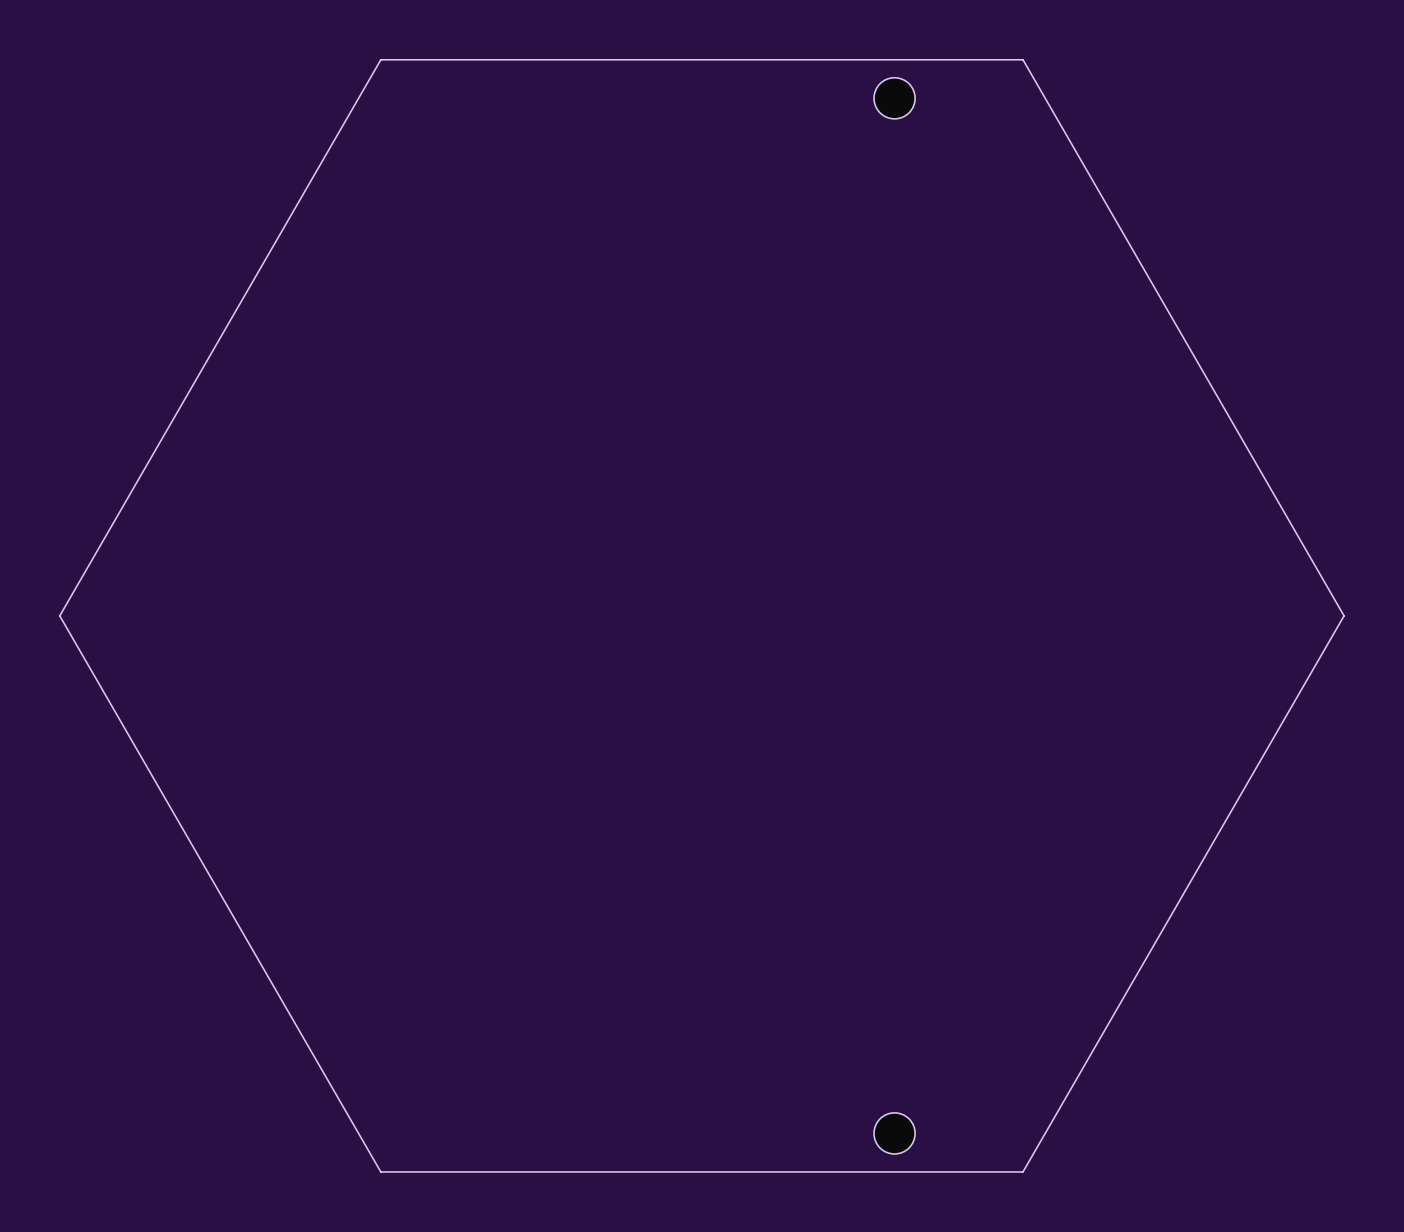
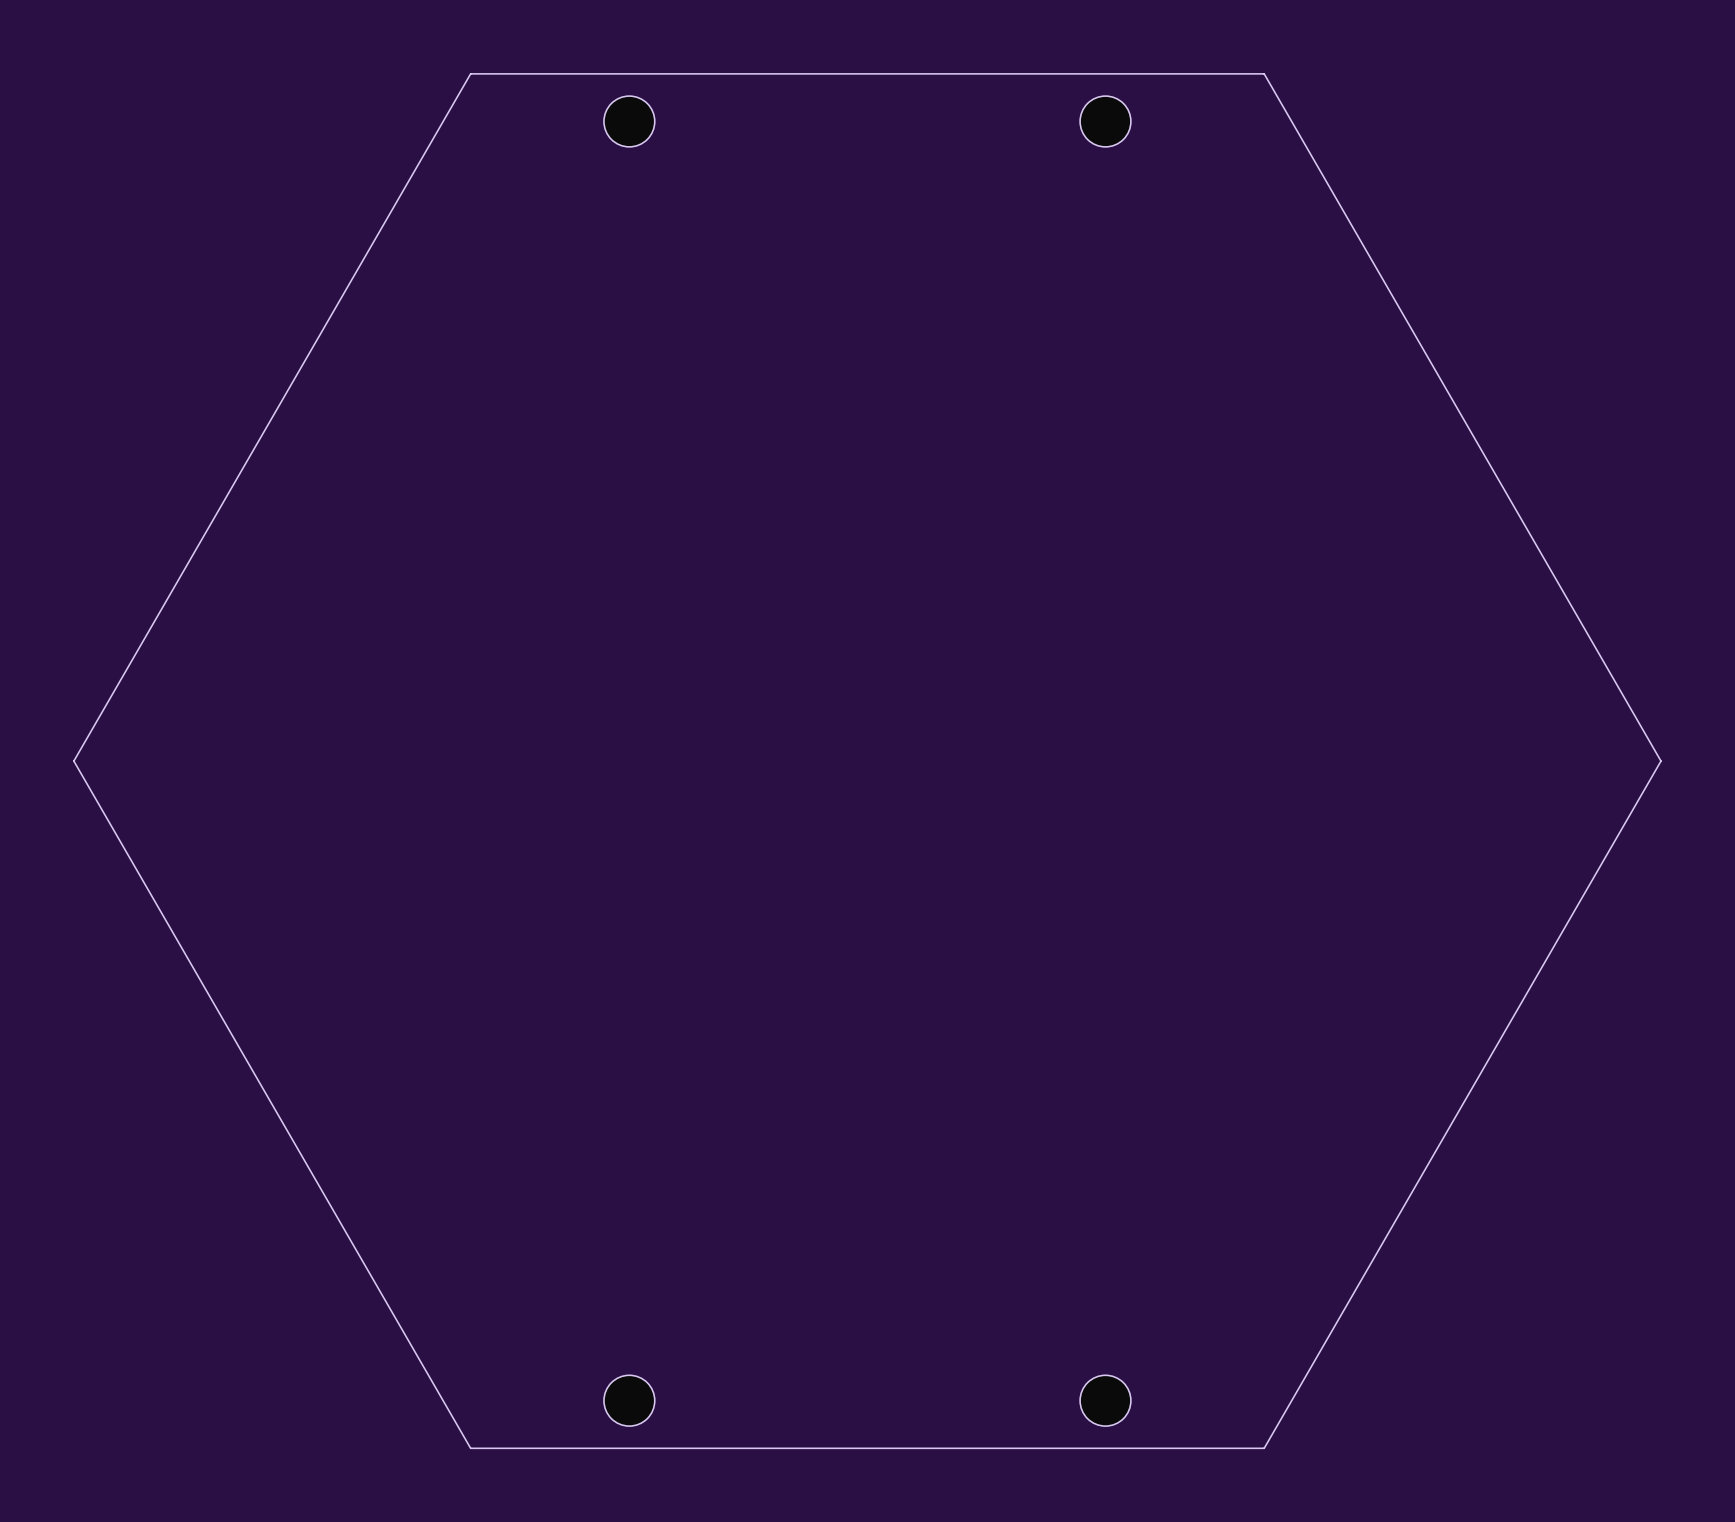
part: none -> (629, 121)
part: none -> (629, 1400)

